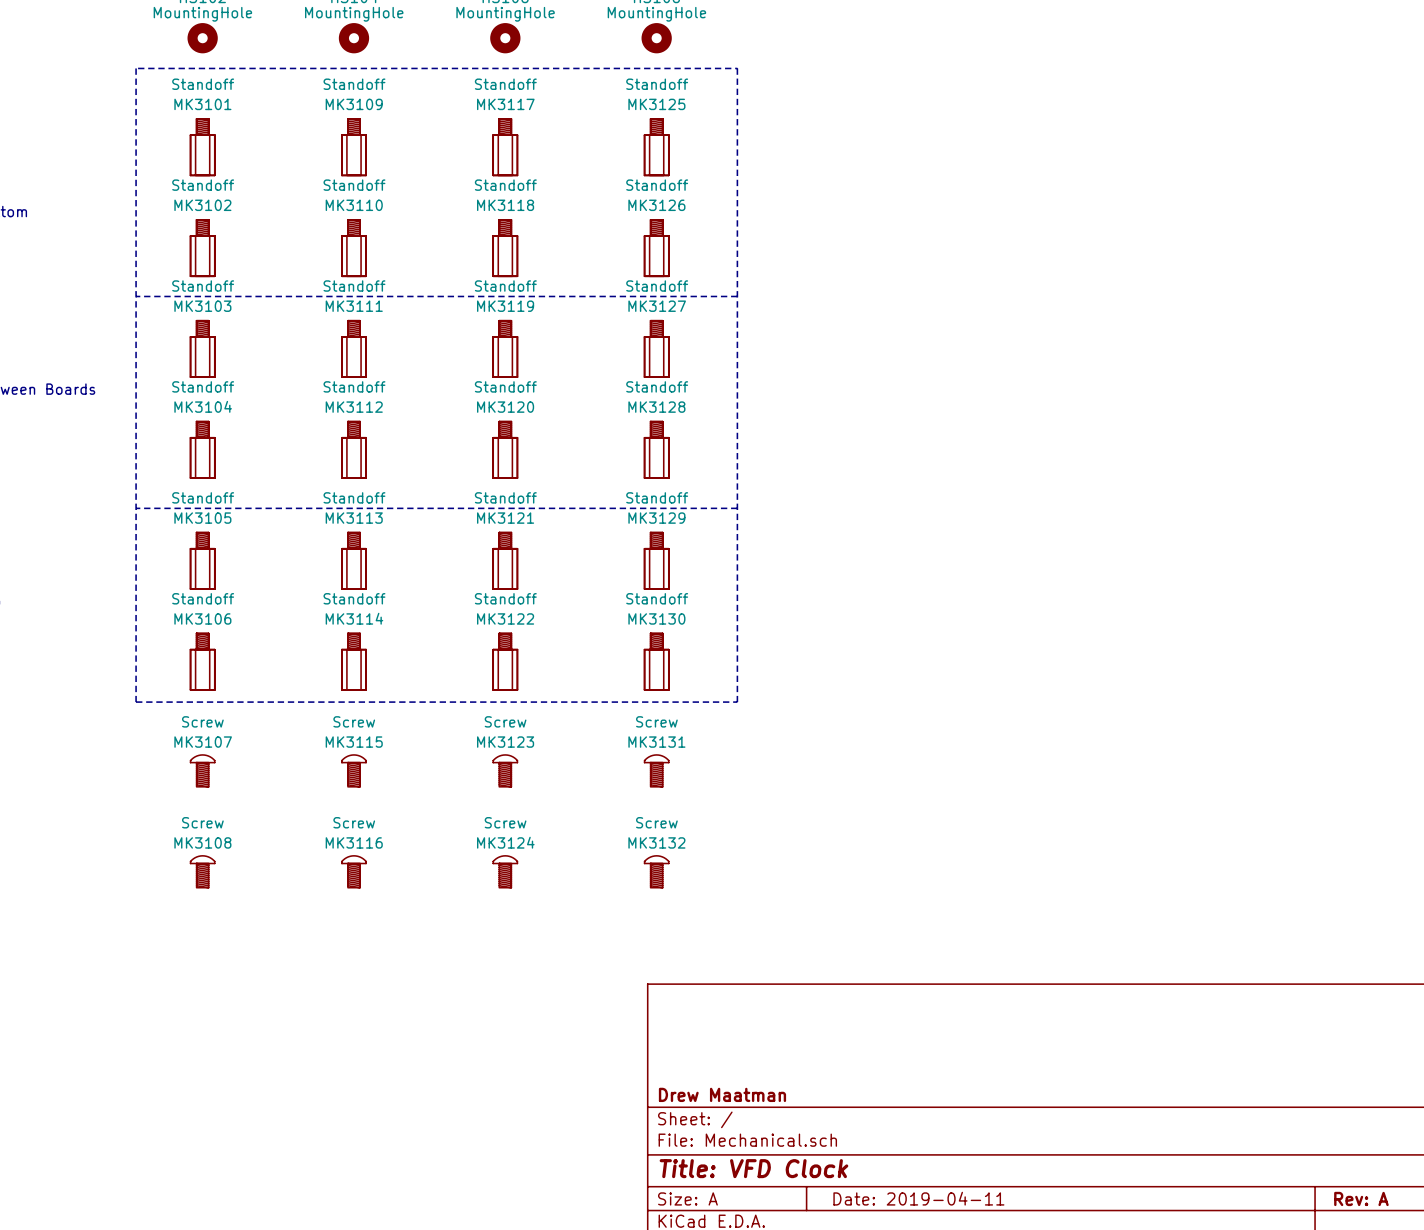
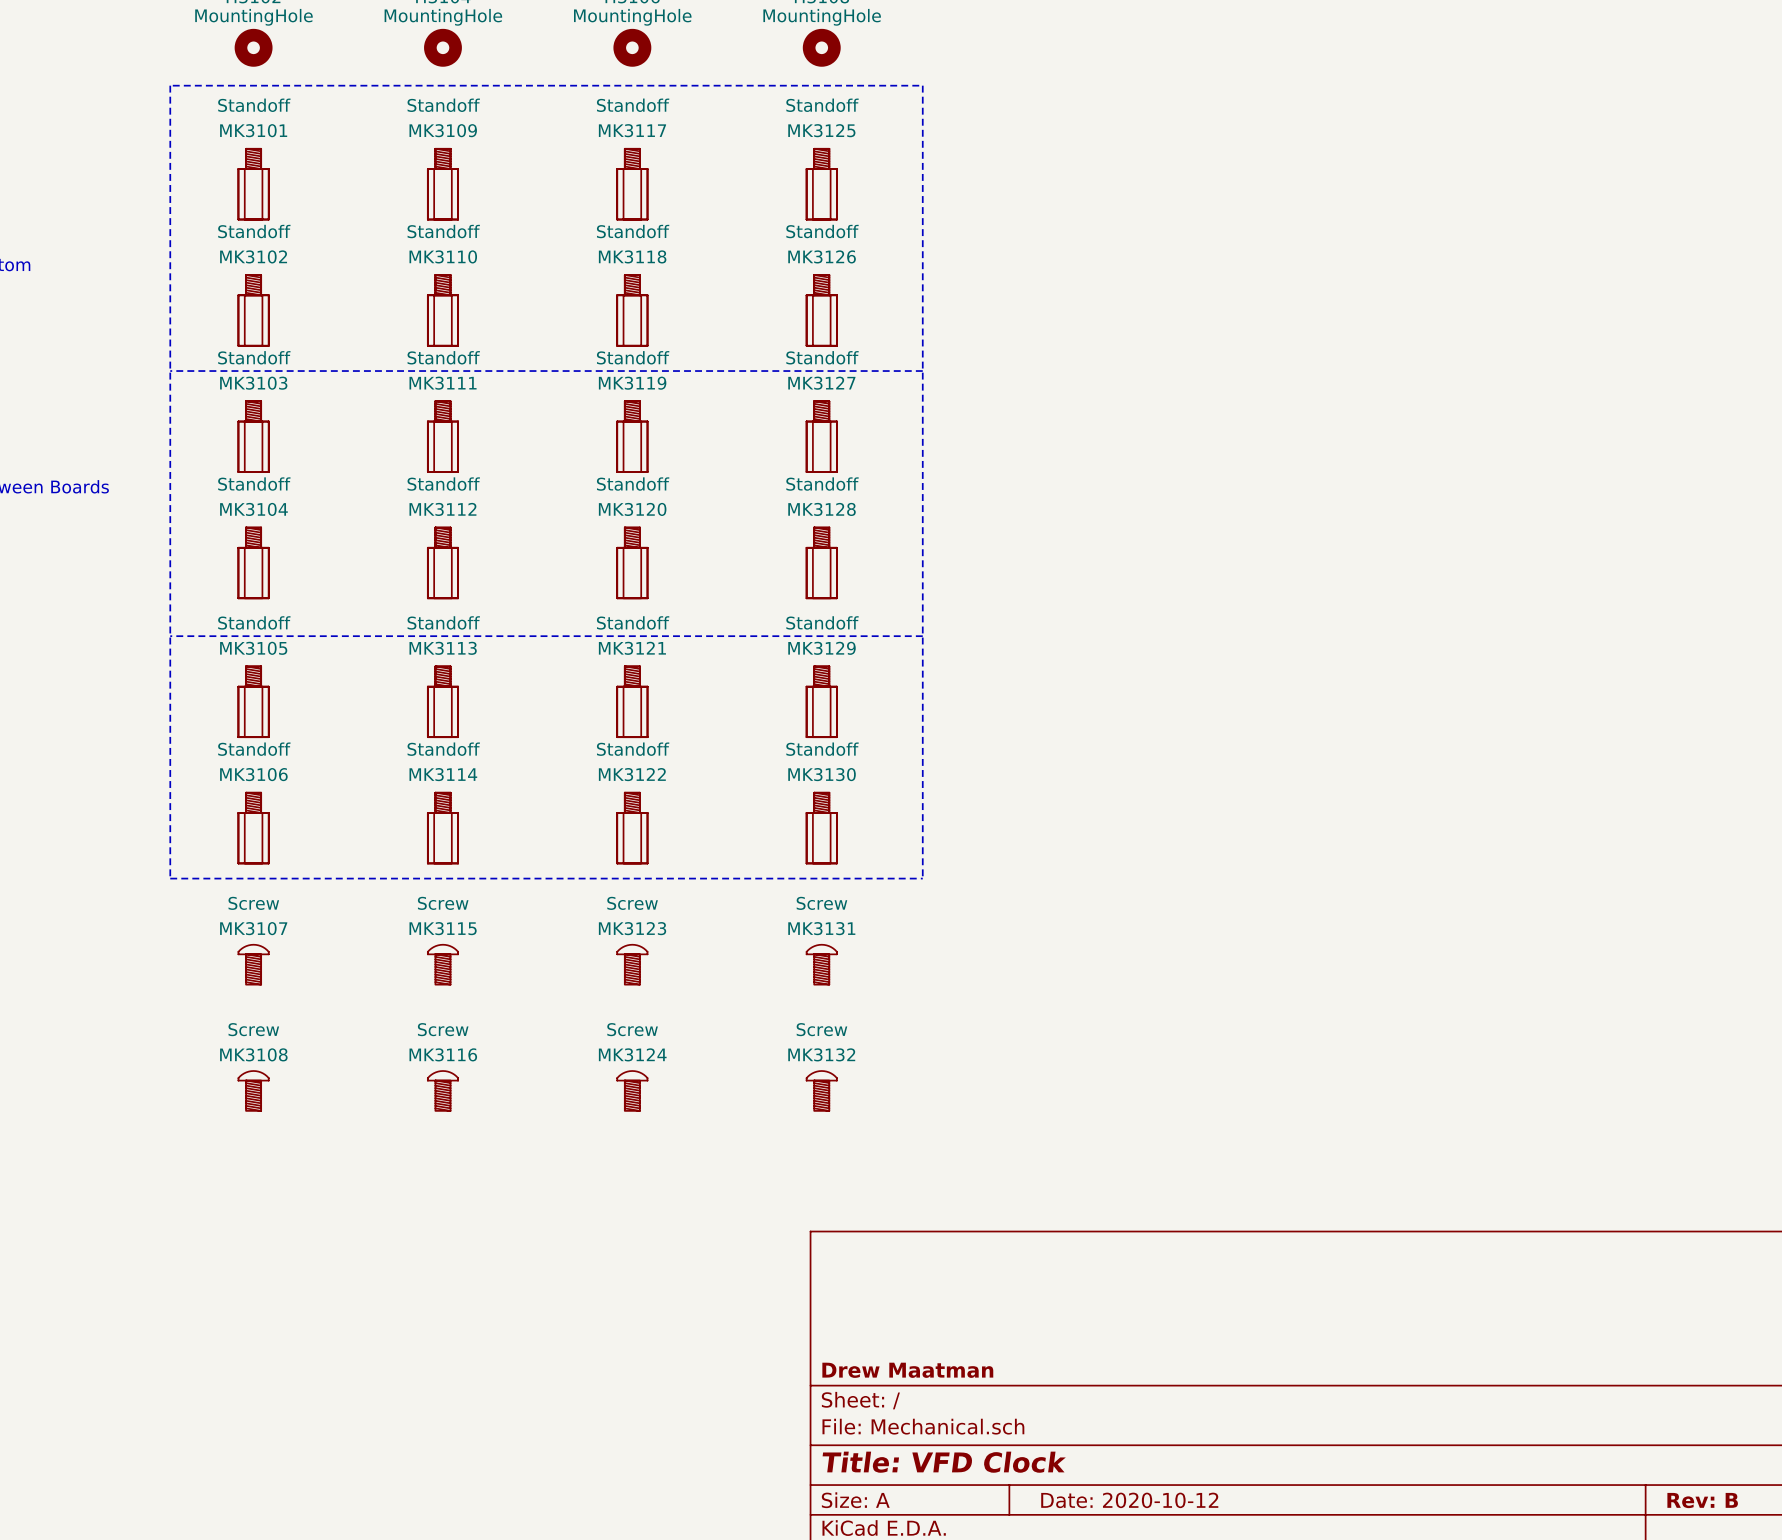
title block: Date: 2019-04-11 (918, 1198) -> Date: 2020-10-12 (1129, 1500)
title block: Rev: A (1361, 1198) -> Rev: B (1702, 1500)

